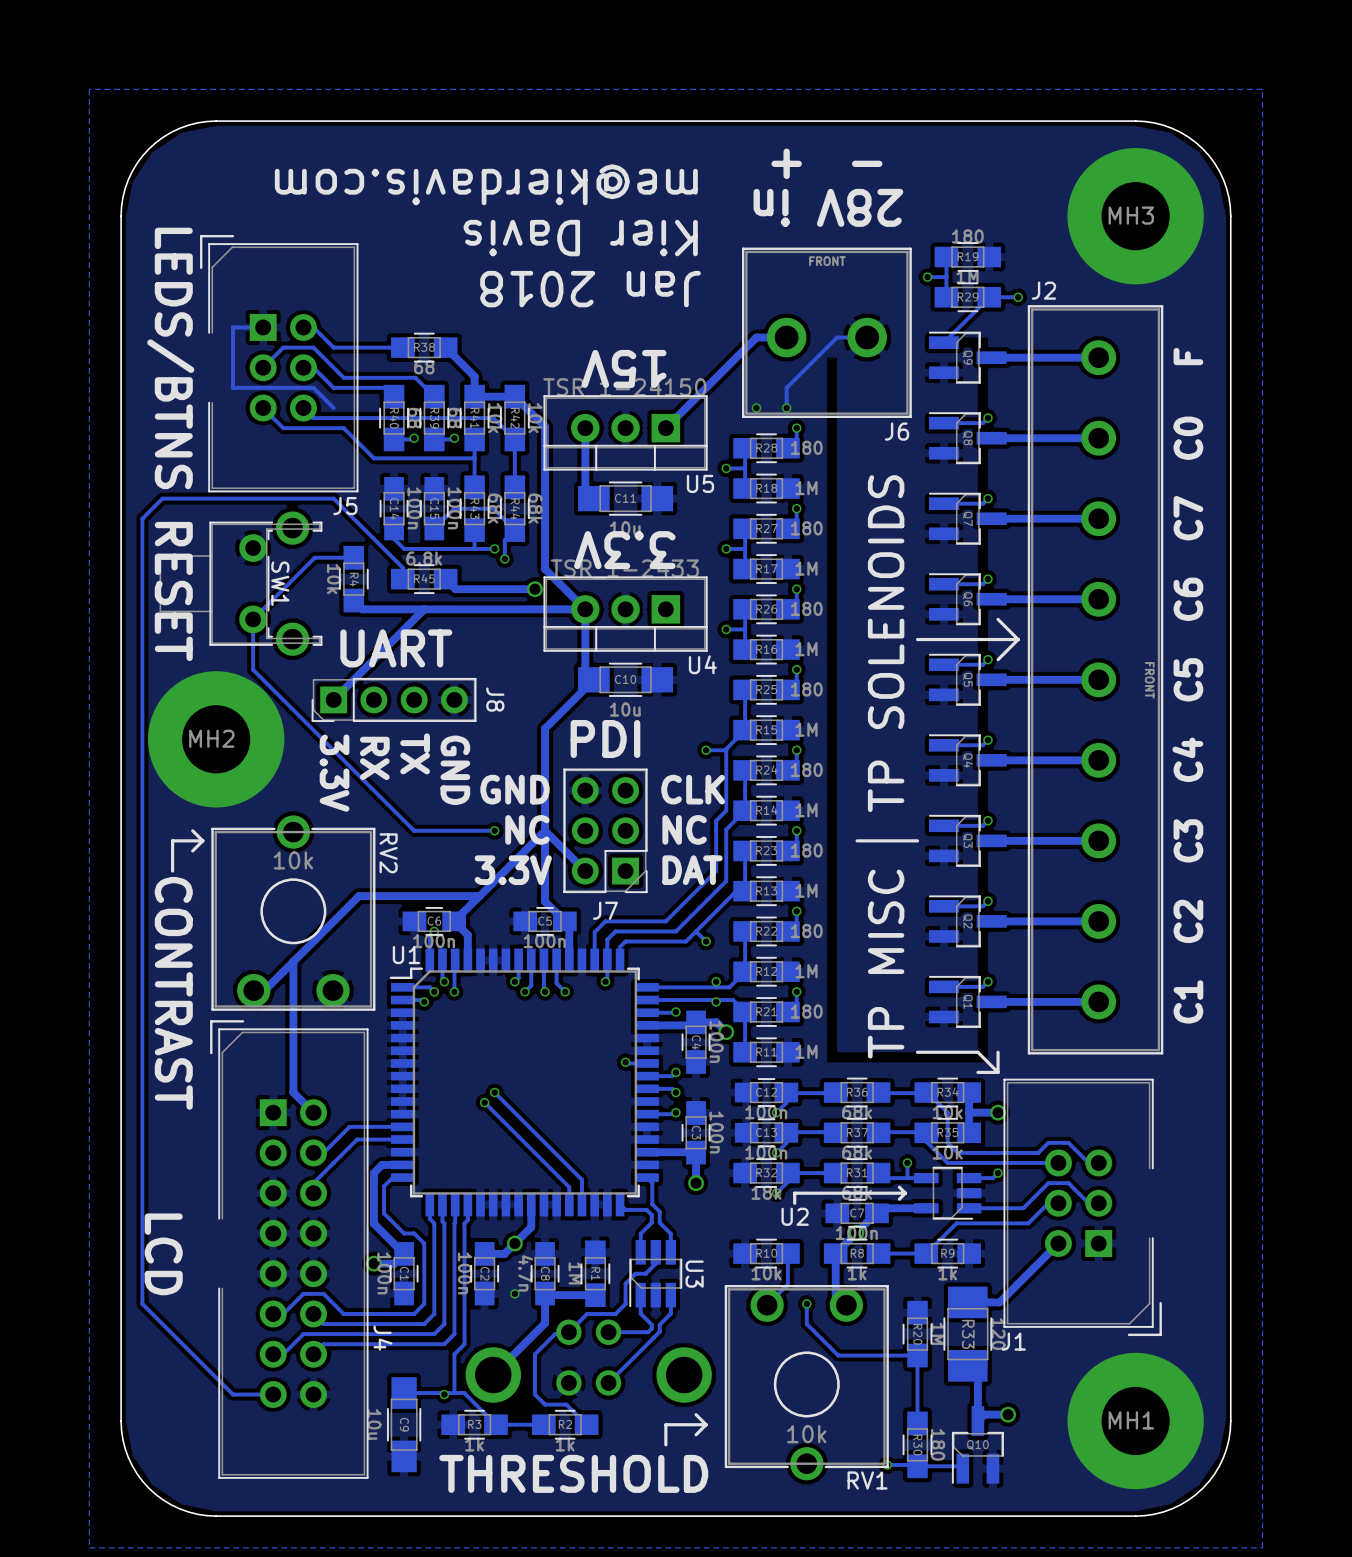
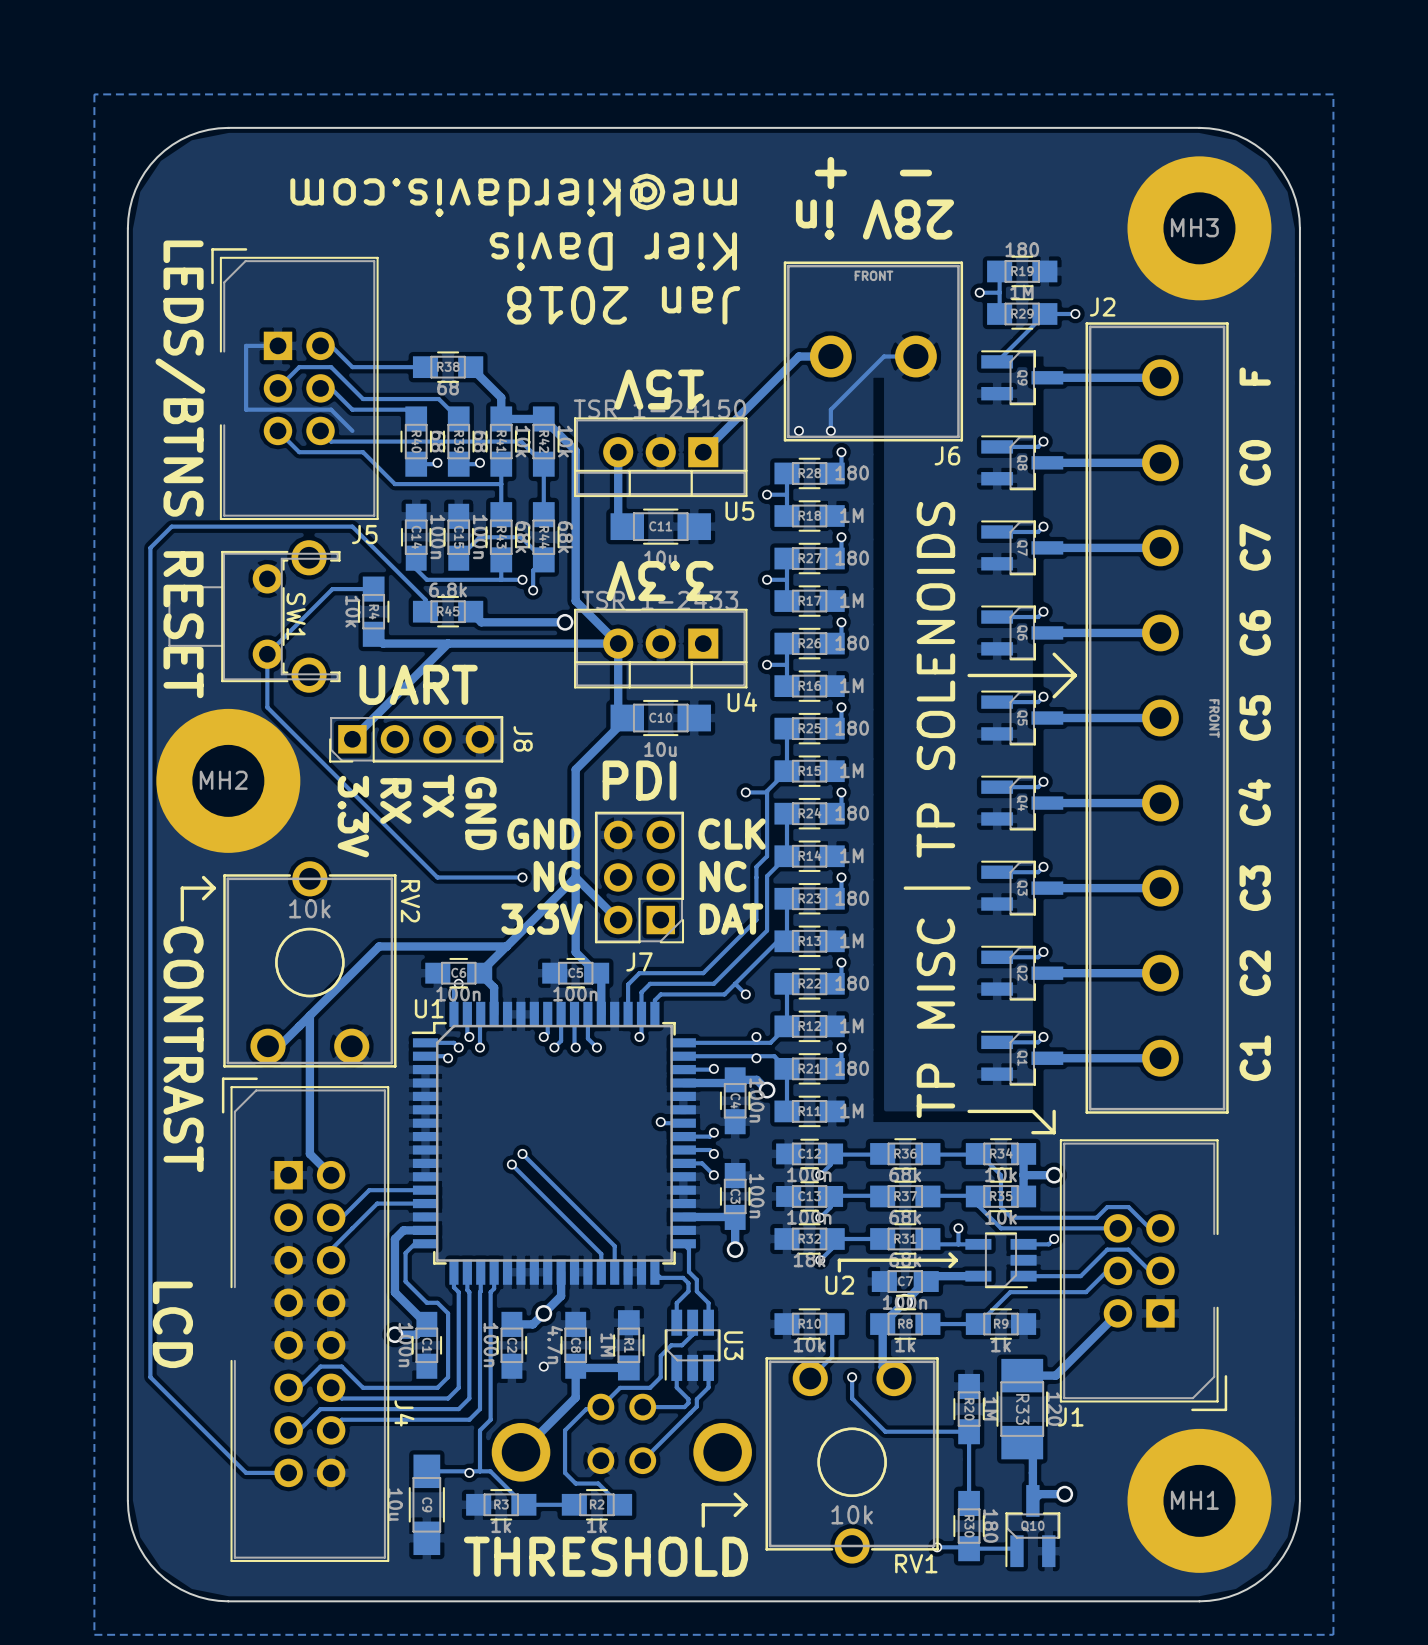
track: none -> (683, 1163) (702, 1163) (713, 1175)
track: (674, 1114) (646, 1114) -> none

